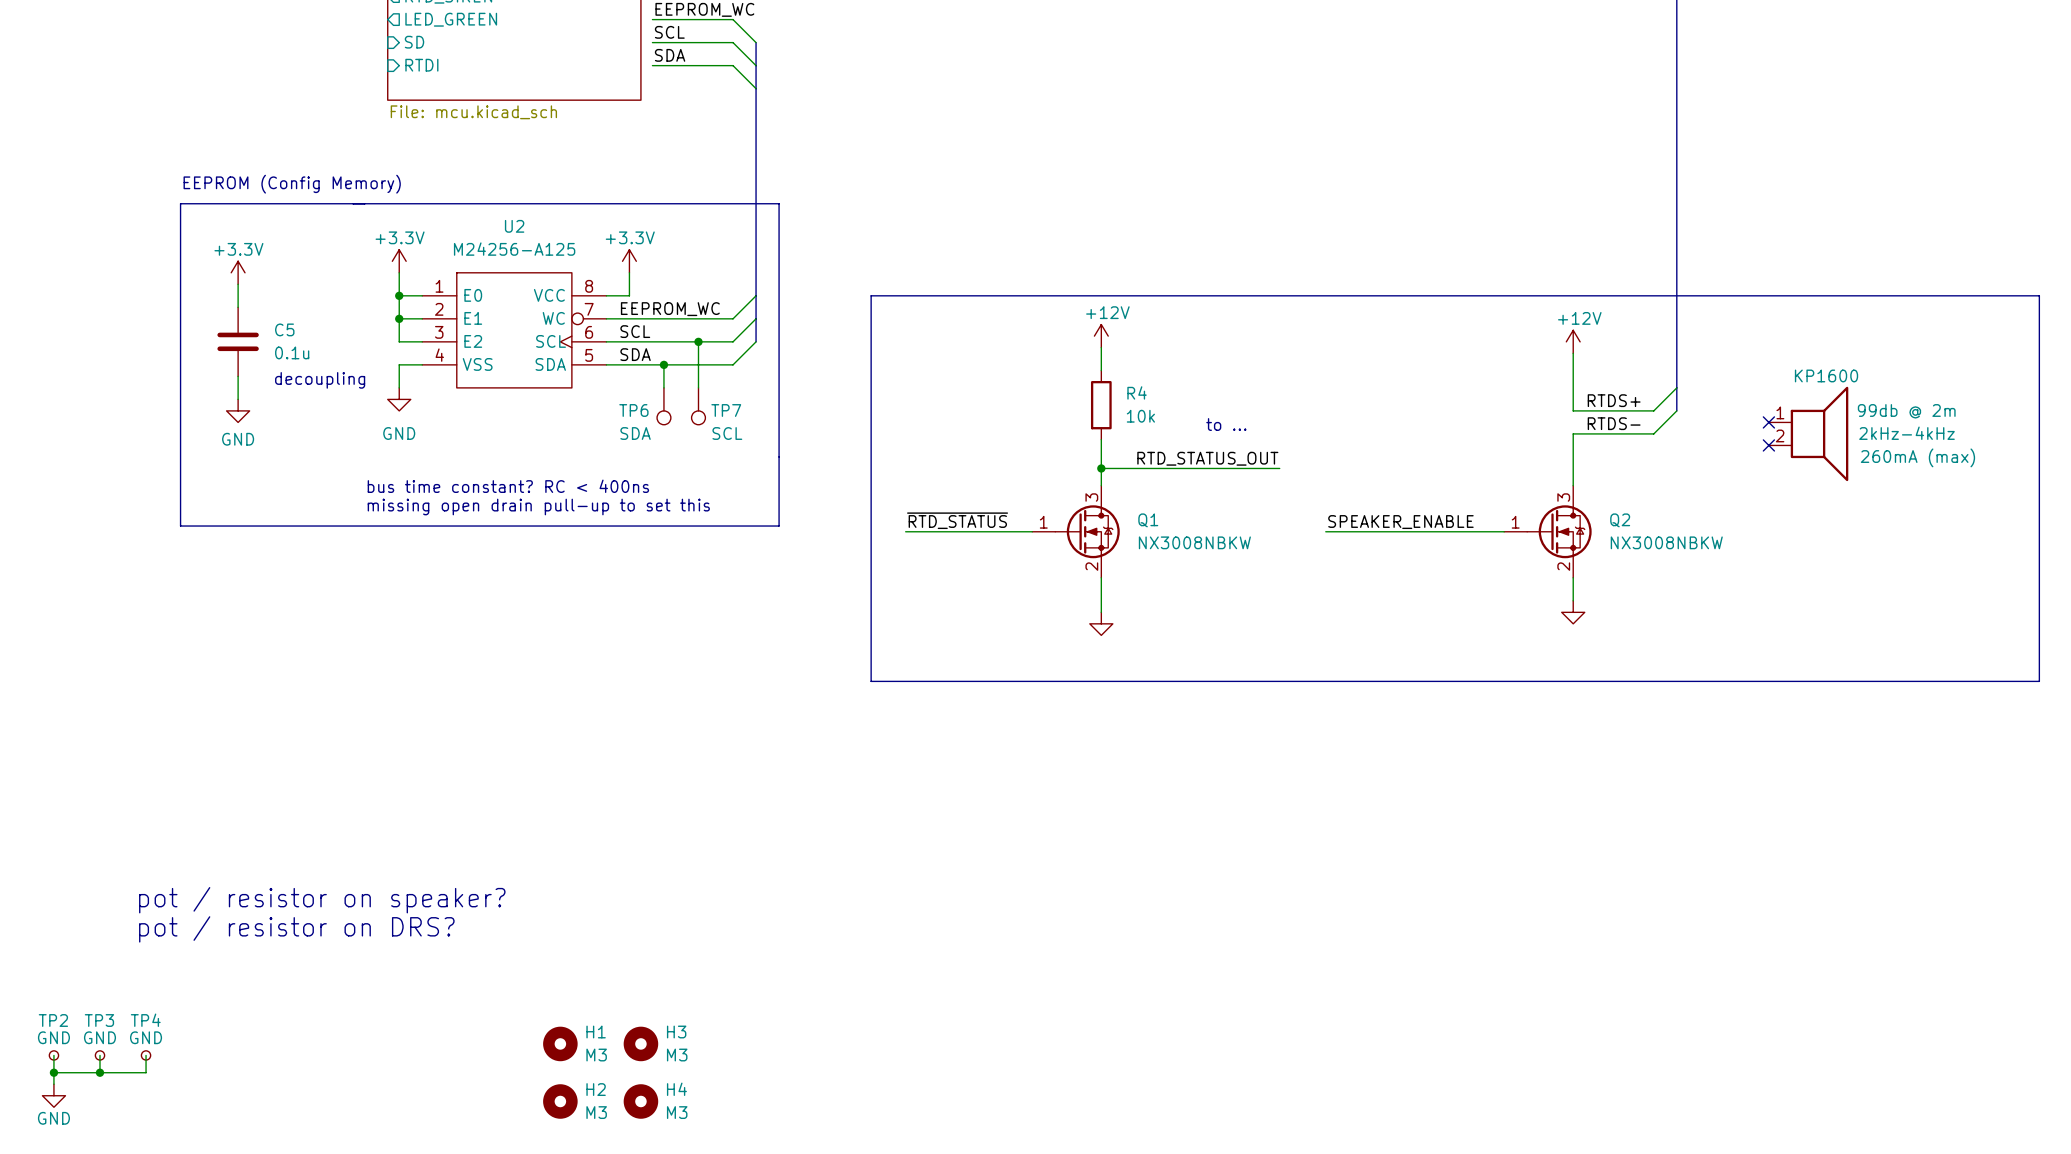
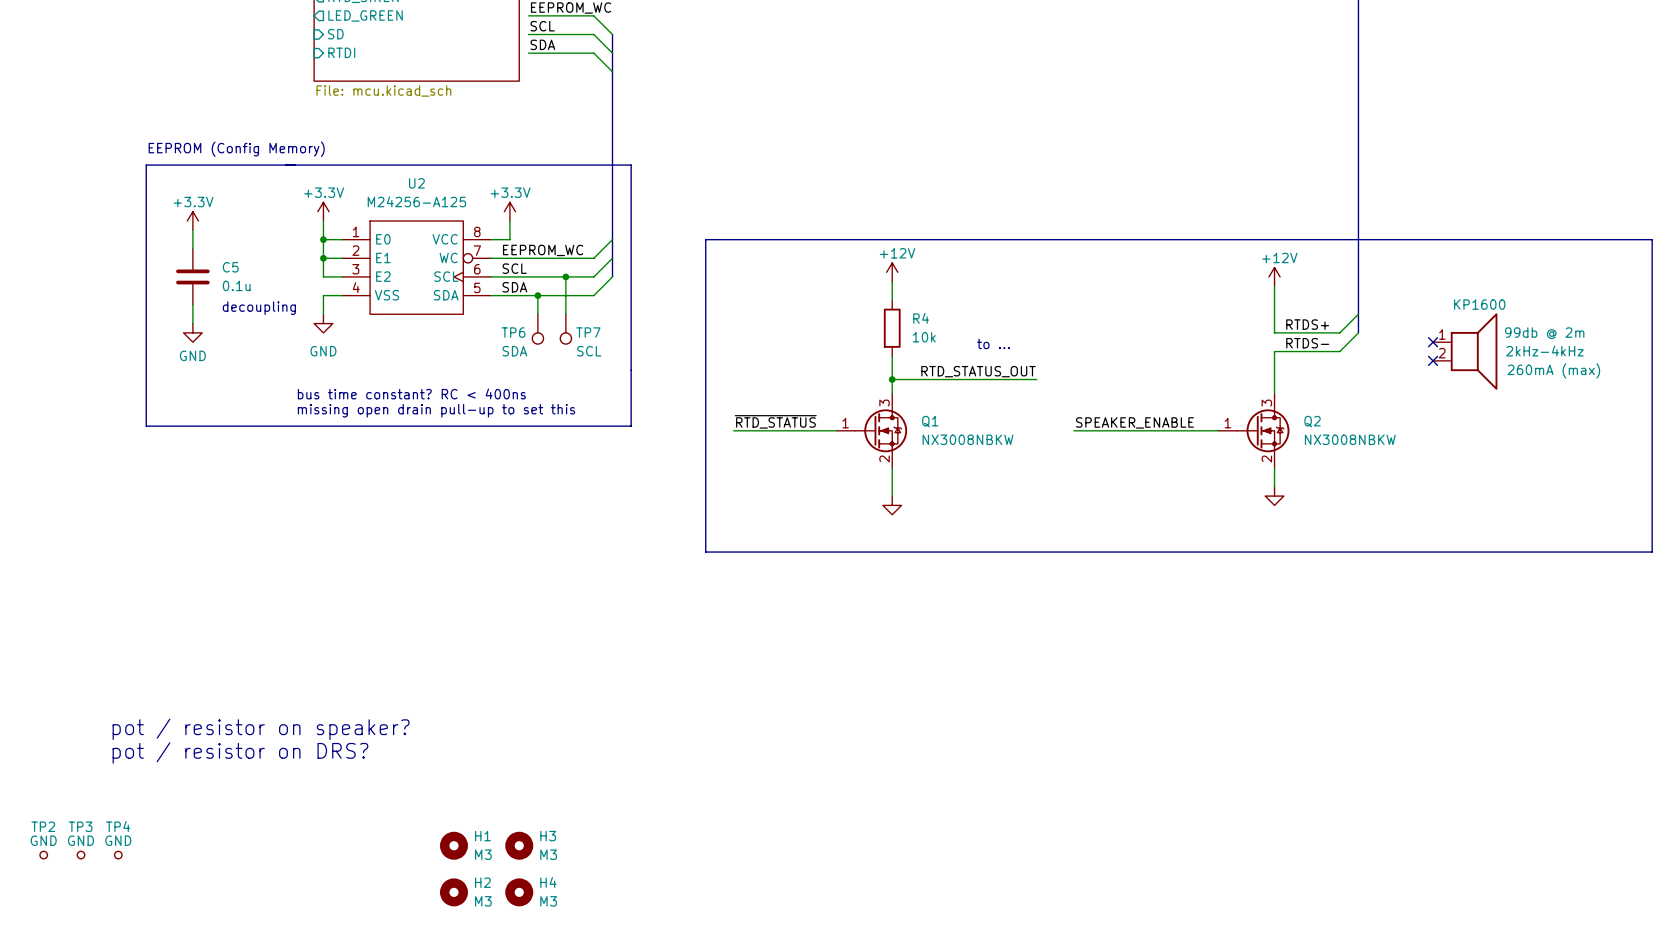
wire: (53, 1055) (53, 1084) -> none
wire: (99, 1055) (99, 1072) -> none
wire: (146, 1055) (146, 1072) (53, 1072) -> none
junction: (53, 1072) -> none
junction: (99, 1072) -> none
power symbol: GND (53, 1095) -> none

